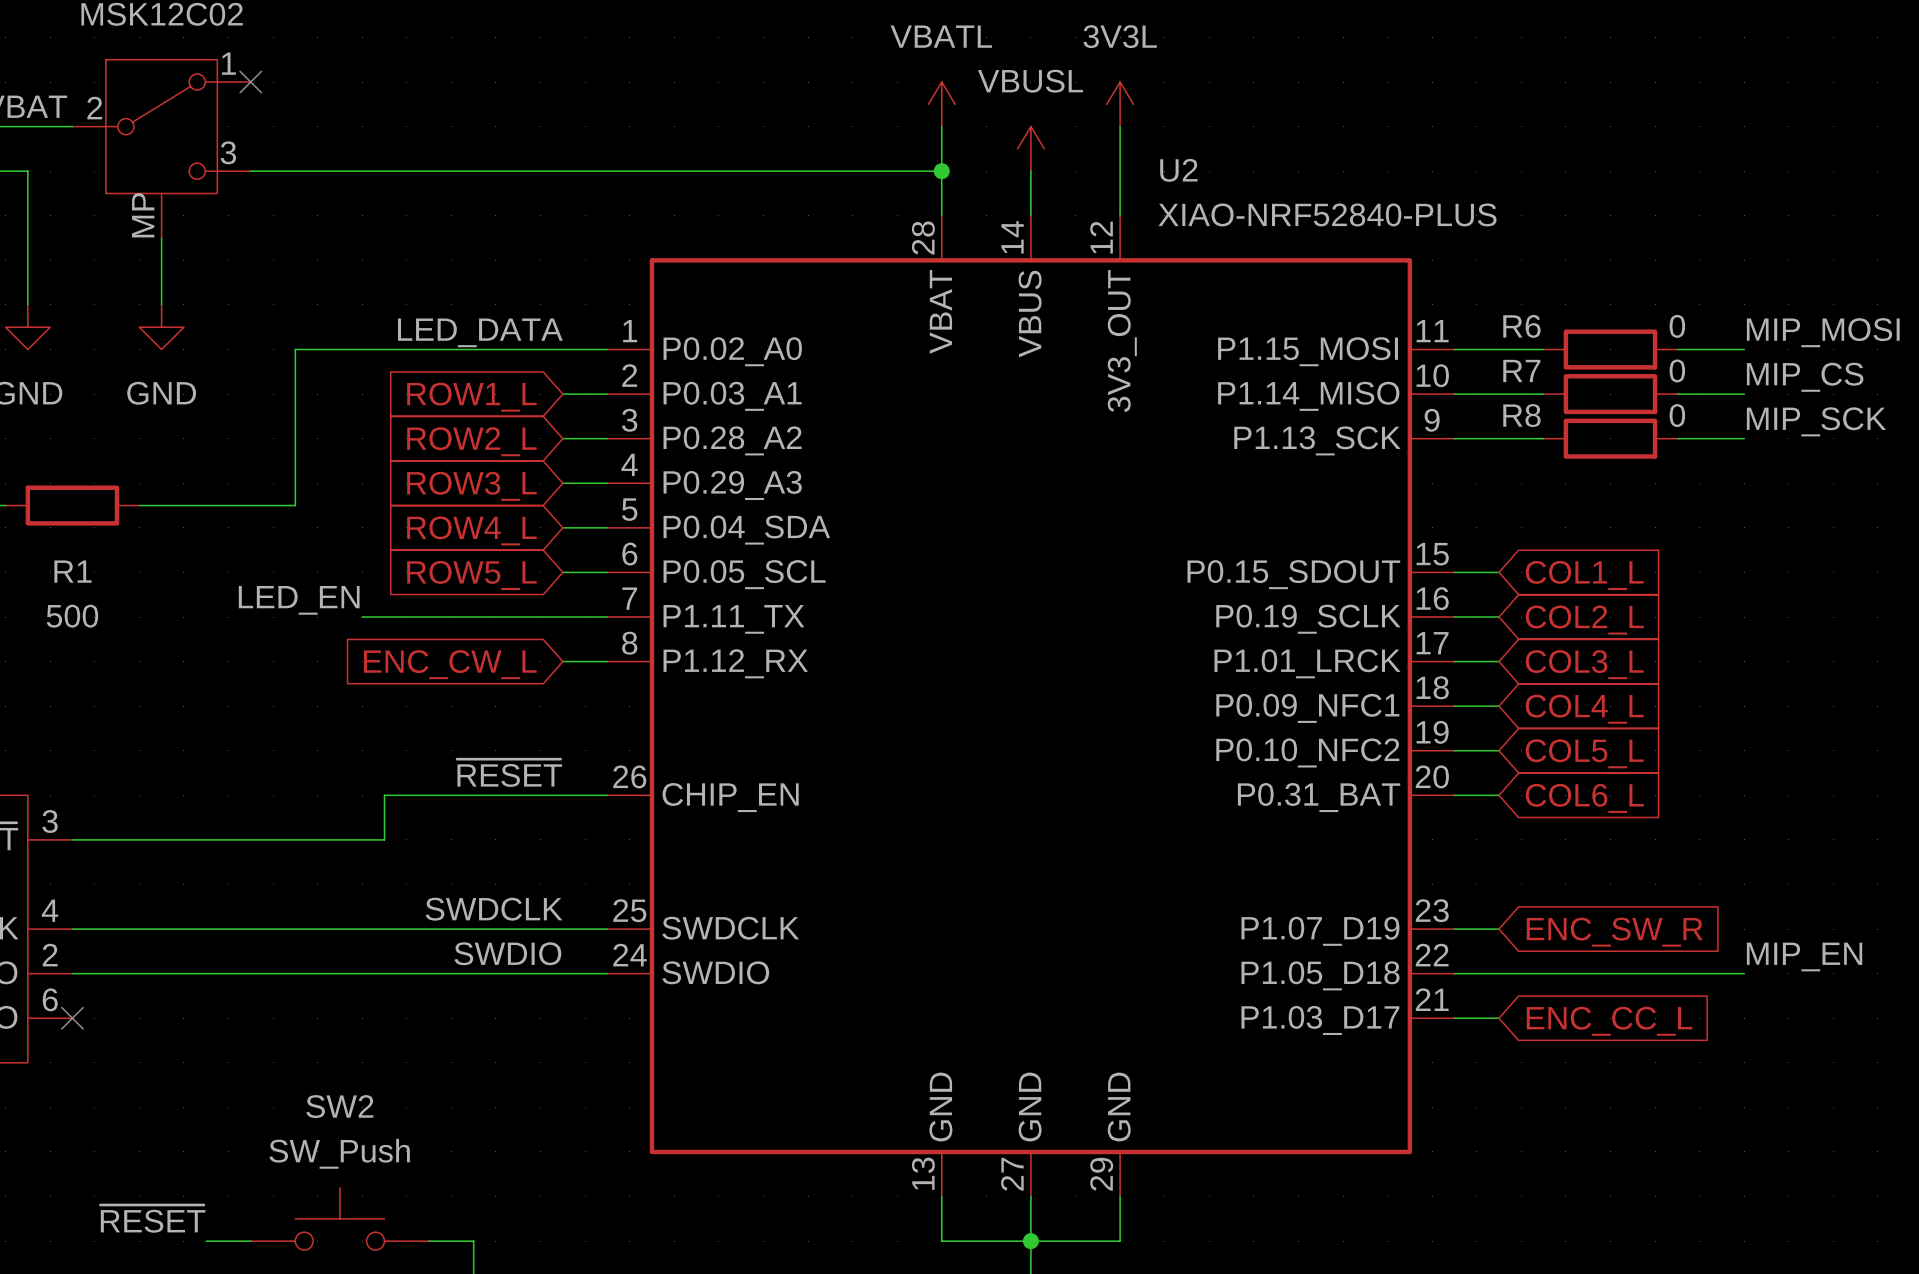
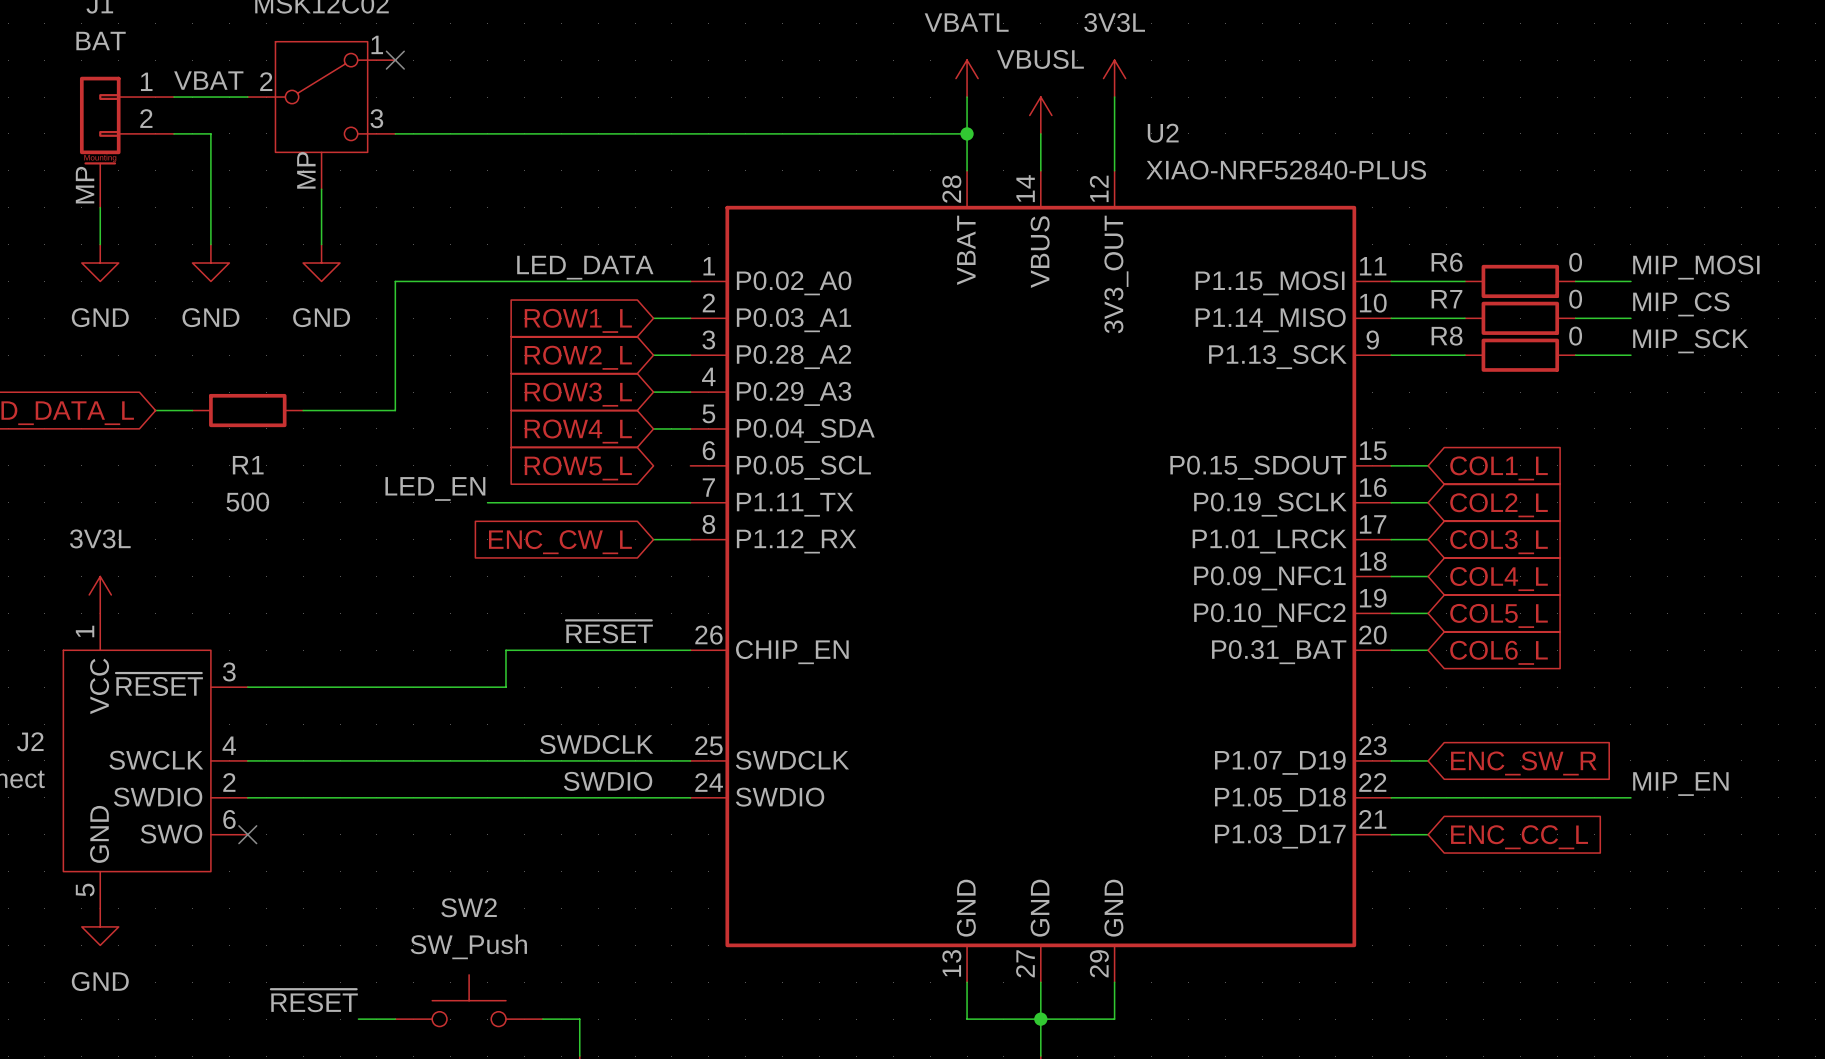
wire: (295, 349) (295, 505) (250, 505) -> (432, 281) (395, 281) (395, 410)
wire: (562, 572) (607, 572) -> none

